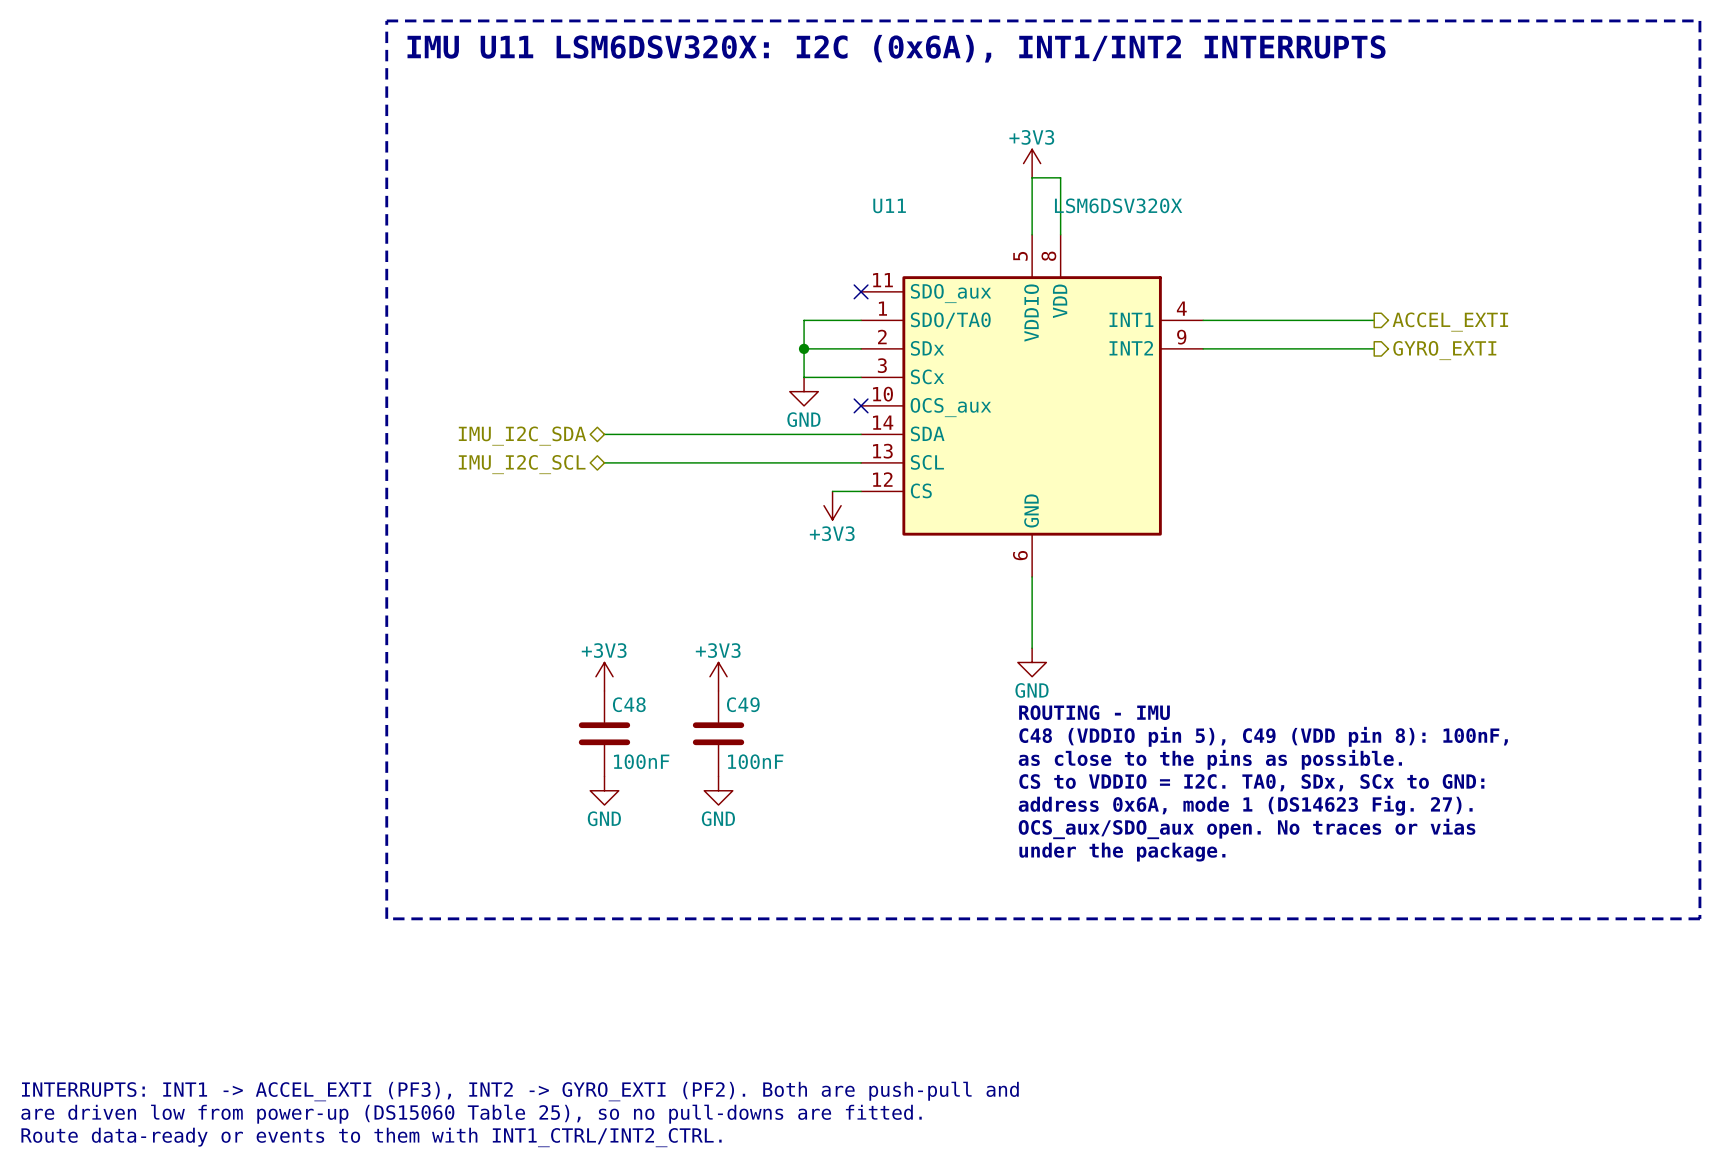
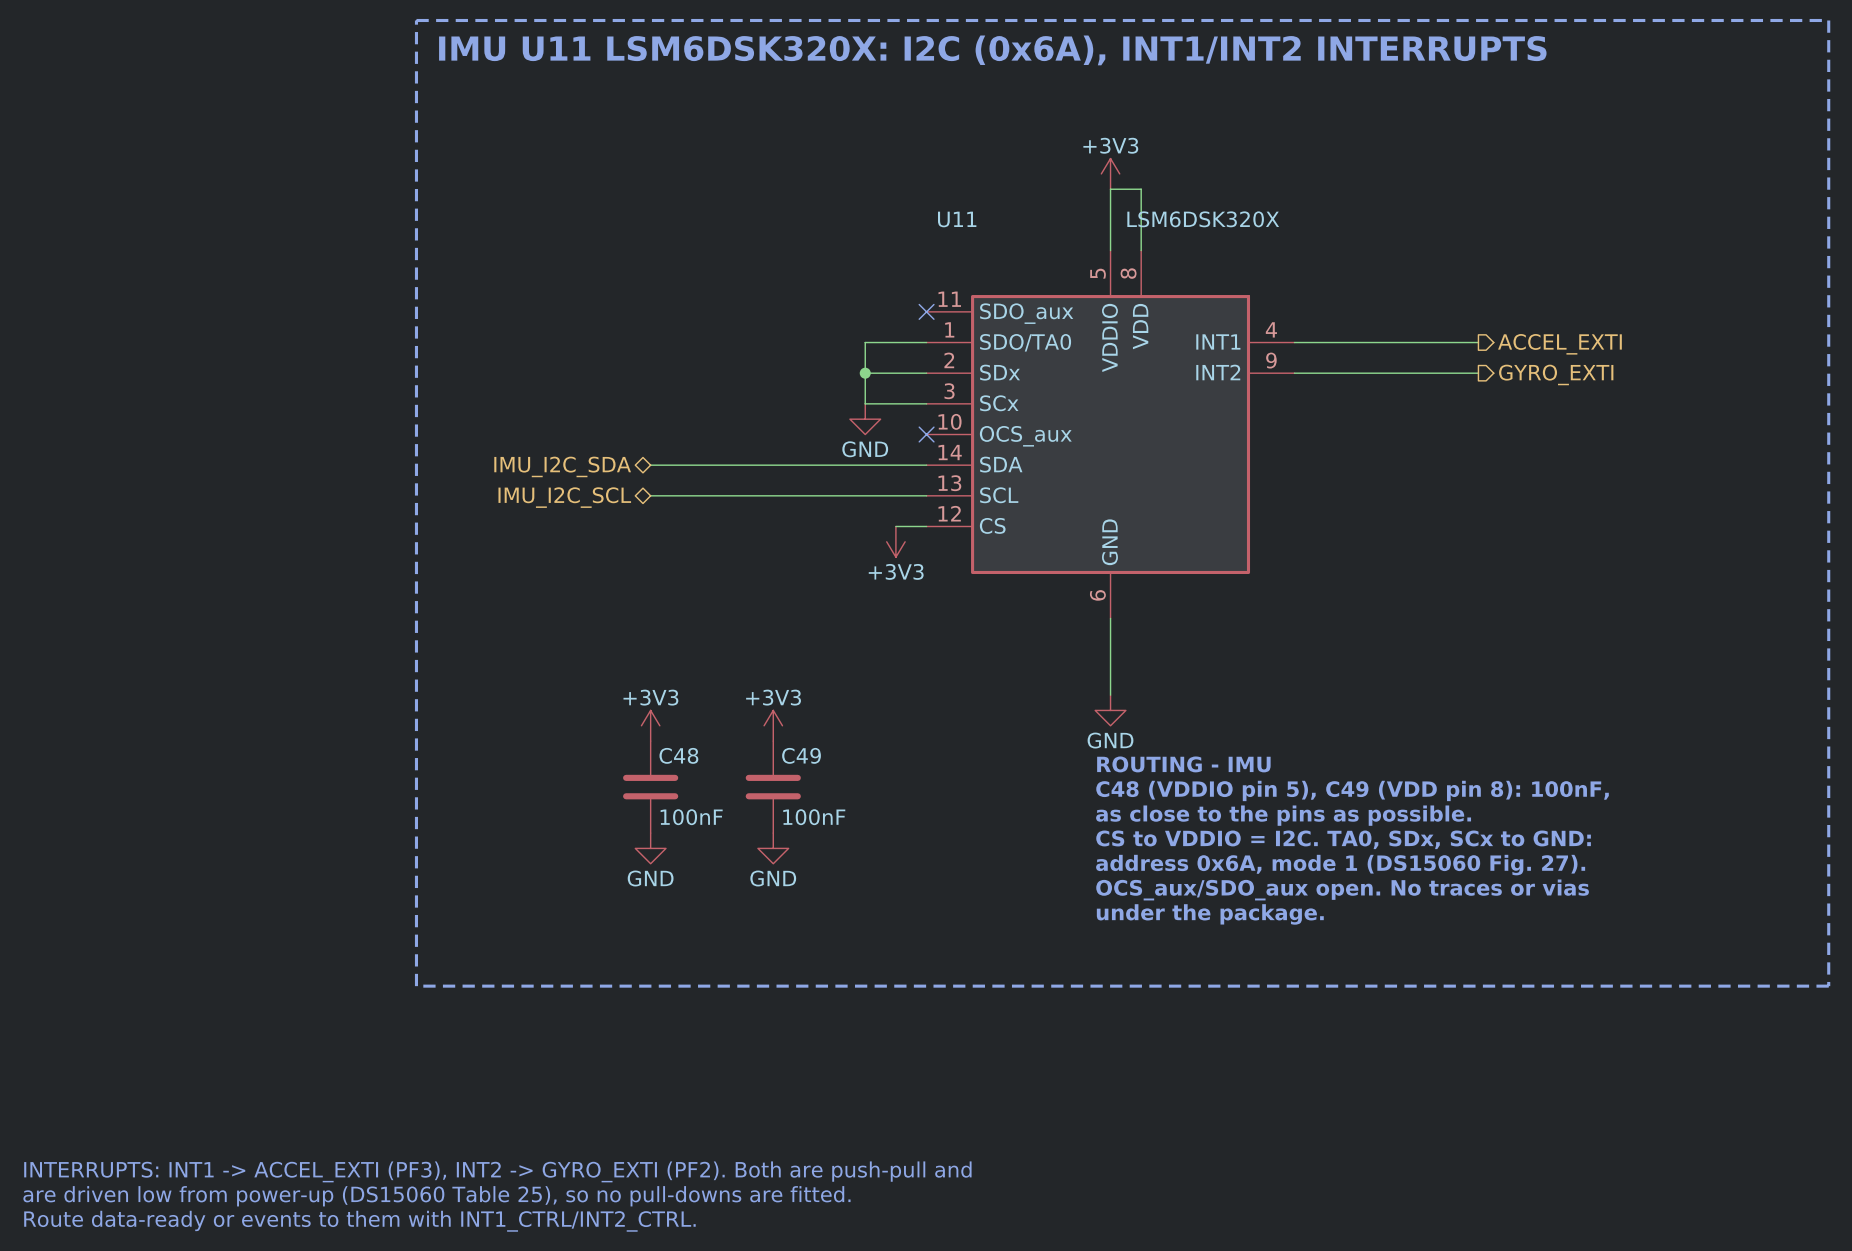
text: IMU U11 LSM6DSV320X: I2C (0x6A), INT1/INT2 INTERRUPTS (896, 48) -> IMU U11 LSM6DSK320X: I2C (0x6A), INT1/INT2 INTERRUPTS (992, 50)
U11 value: LSM6DSV320X (1118, 205) -> LSM6DSK320X (1203, 219)
text: address 0x6A, mode 1 (DS14623 Fig. 27). (1245, 805) -> address 0x6A, mode 1 (DS15060 Fig. 27). (1340, 865)

